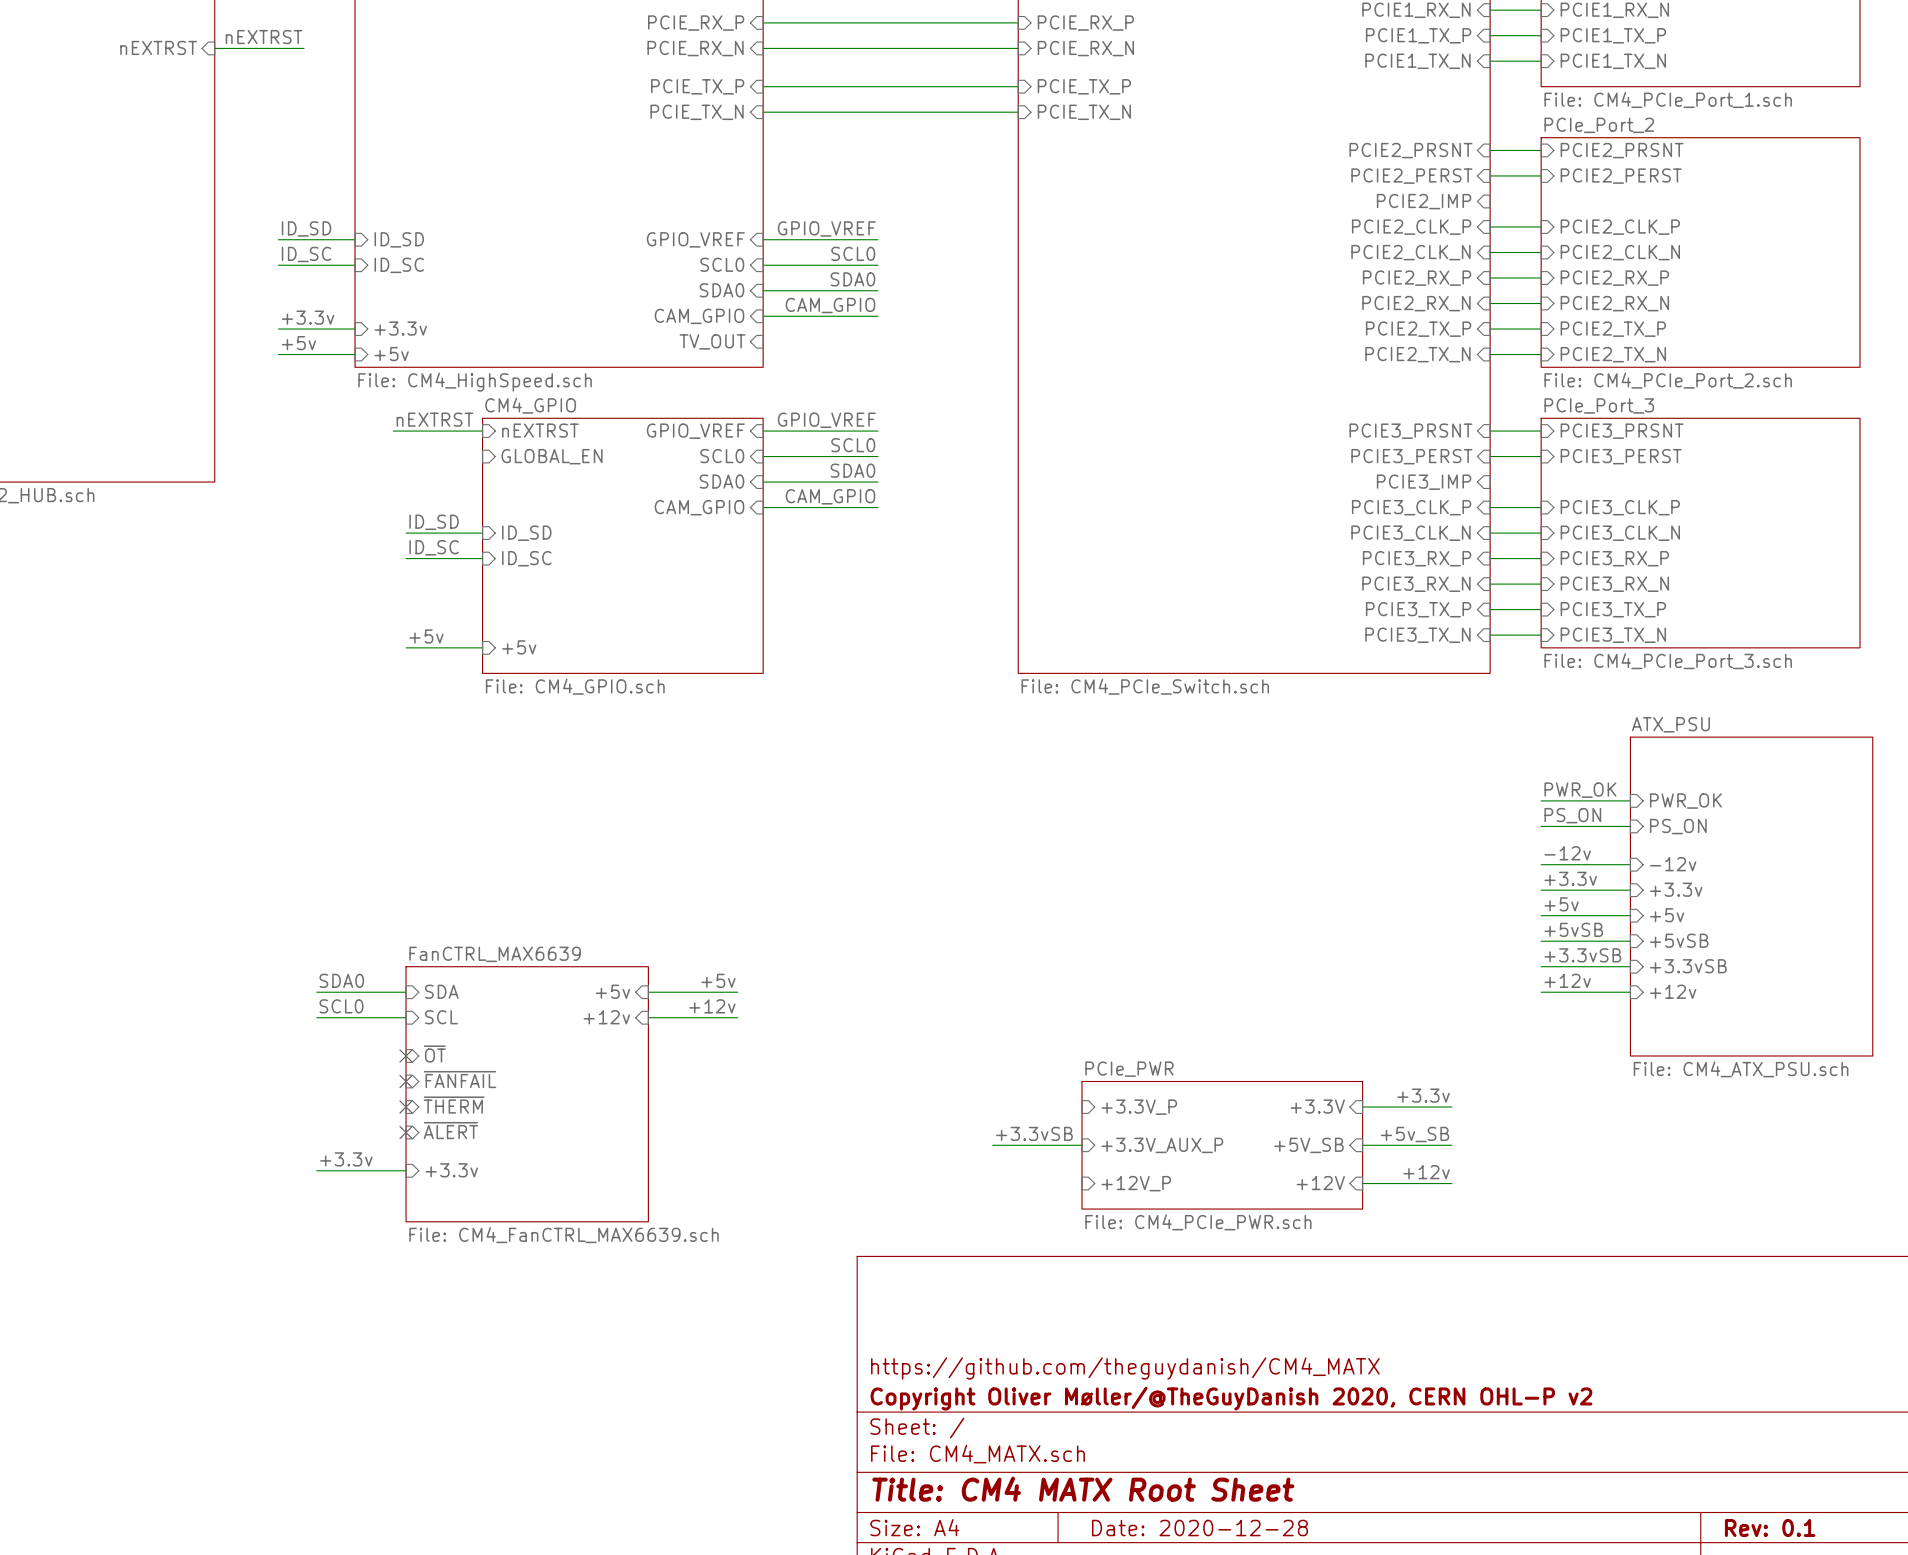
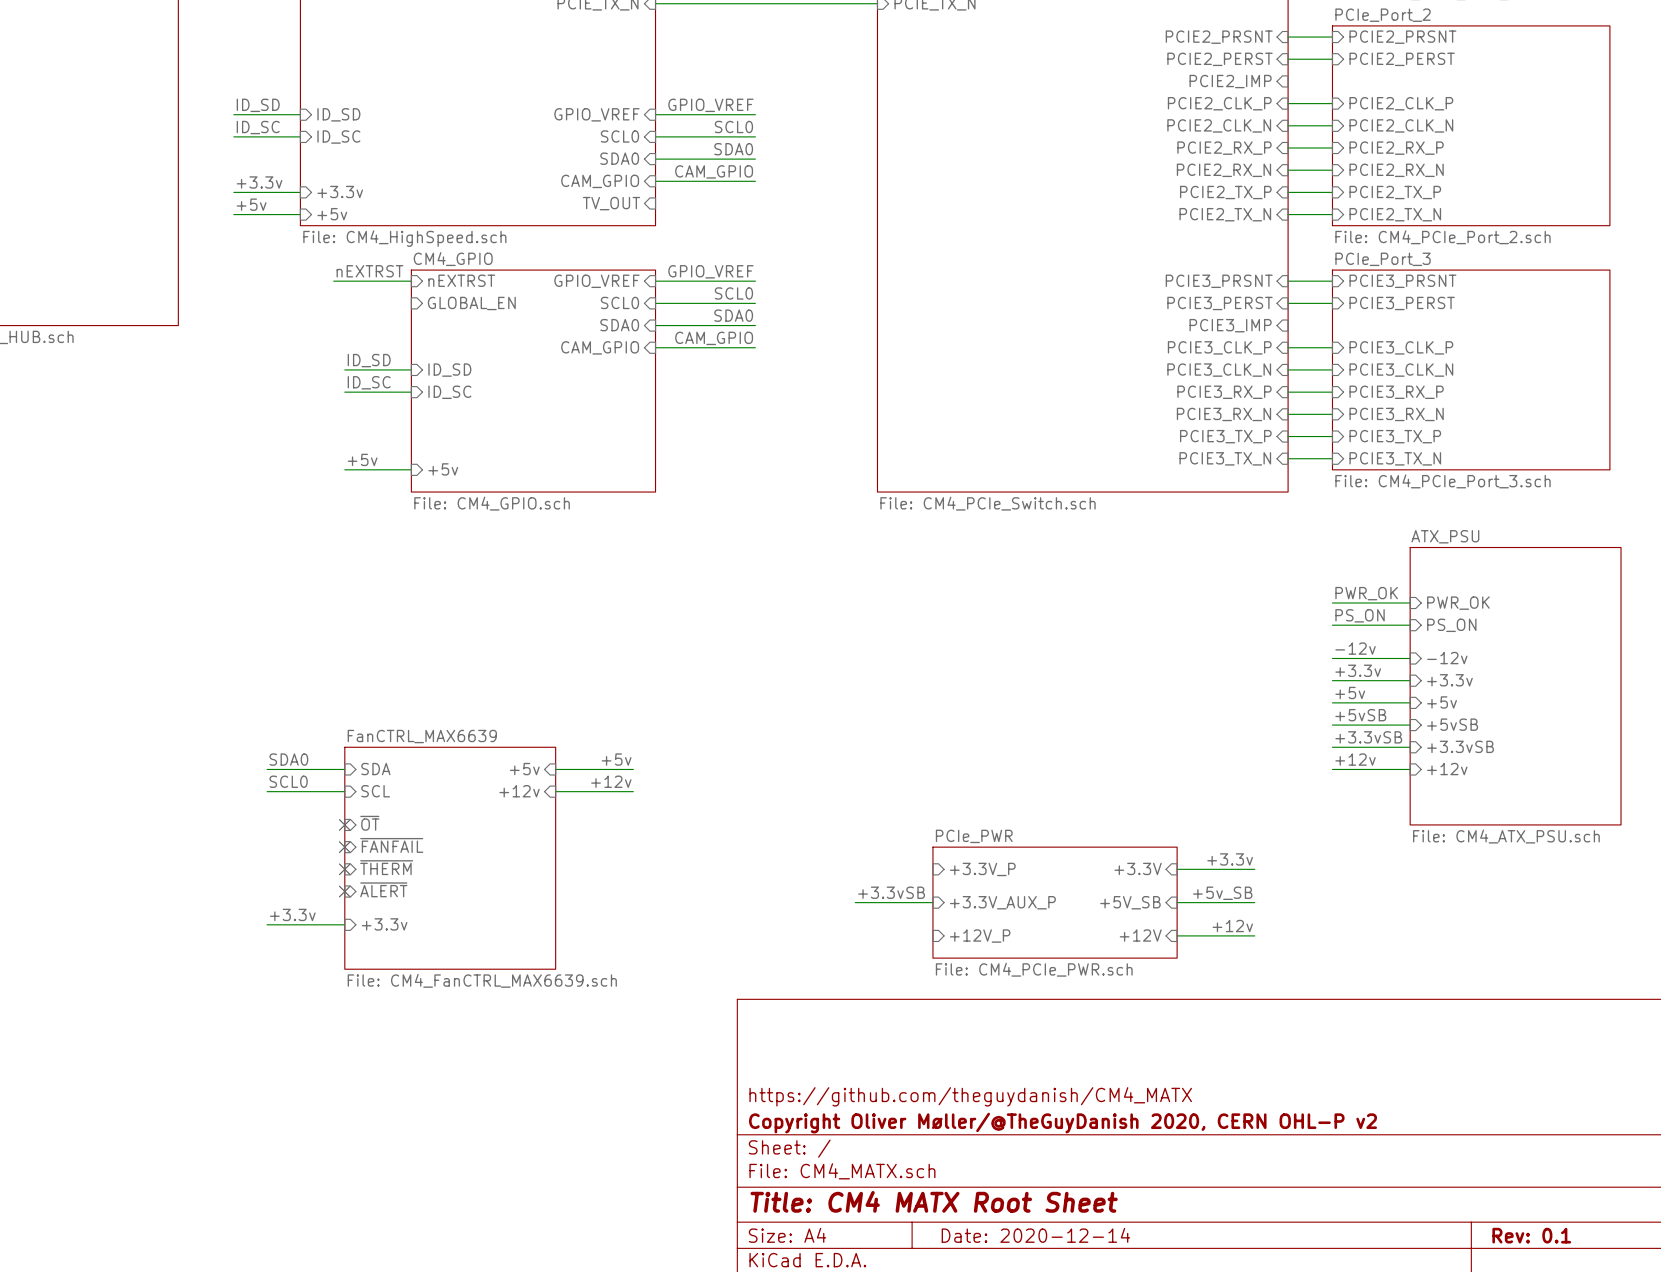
title block: Date: 2020-12-28 (1199, 1528) -> Date: 2020-12-14 (1035, 1235)

